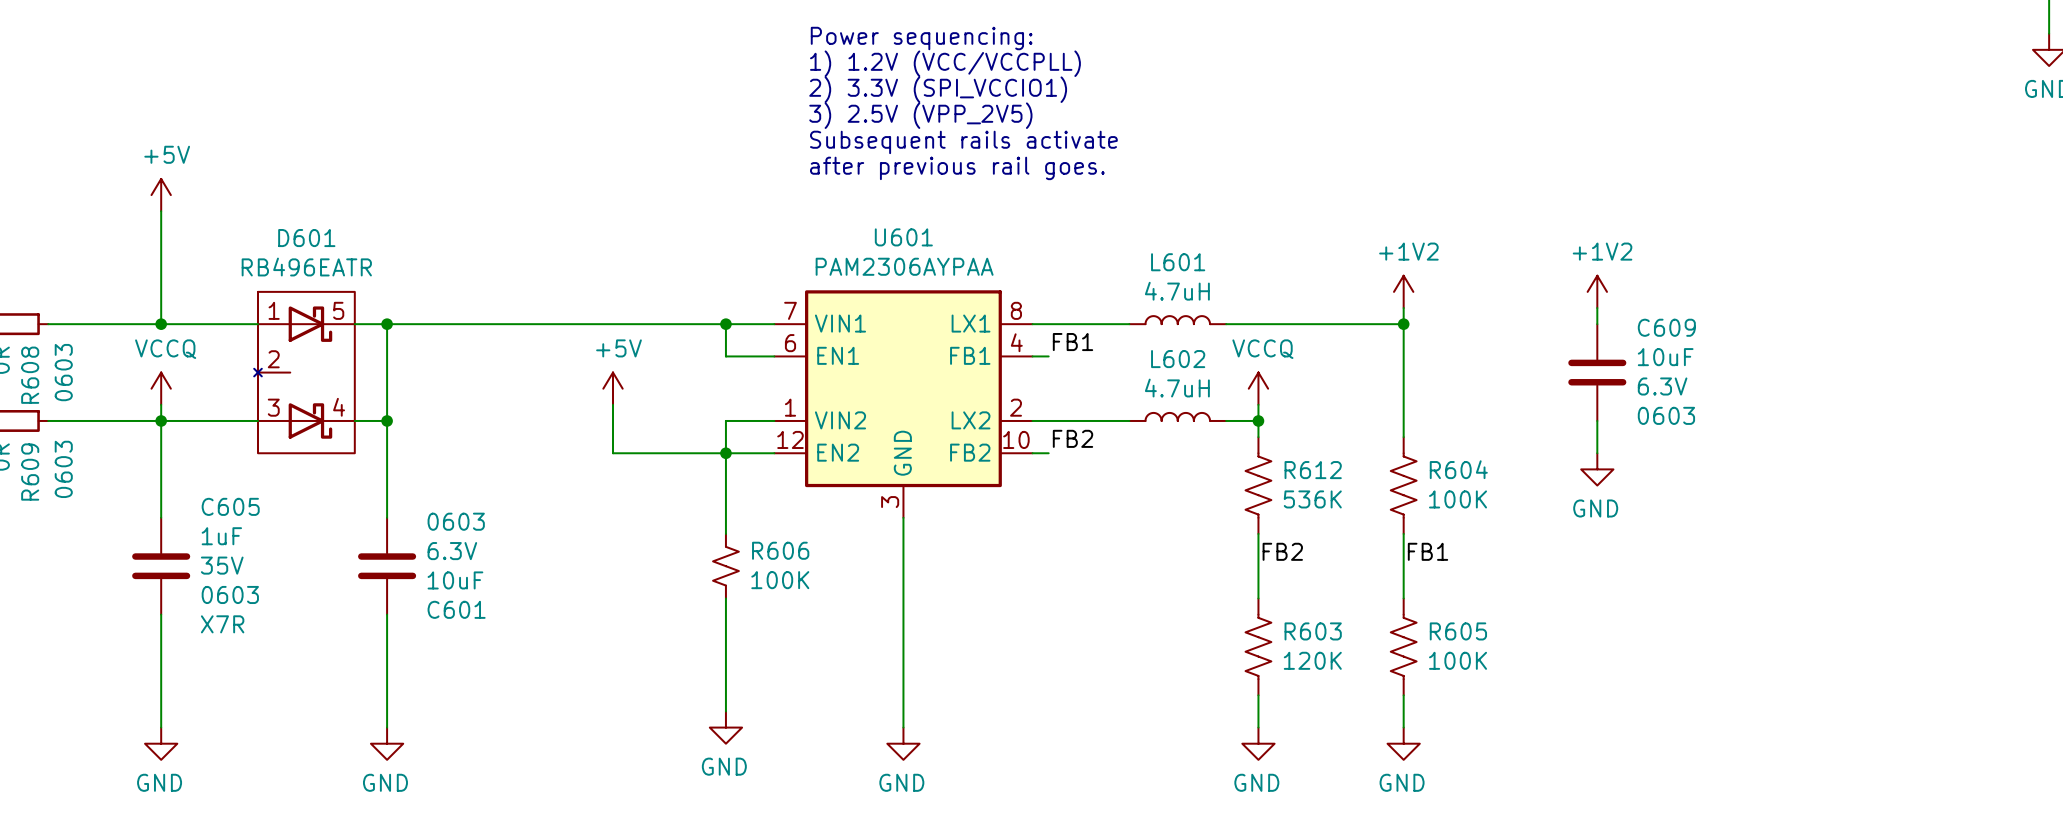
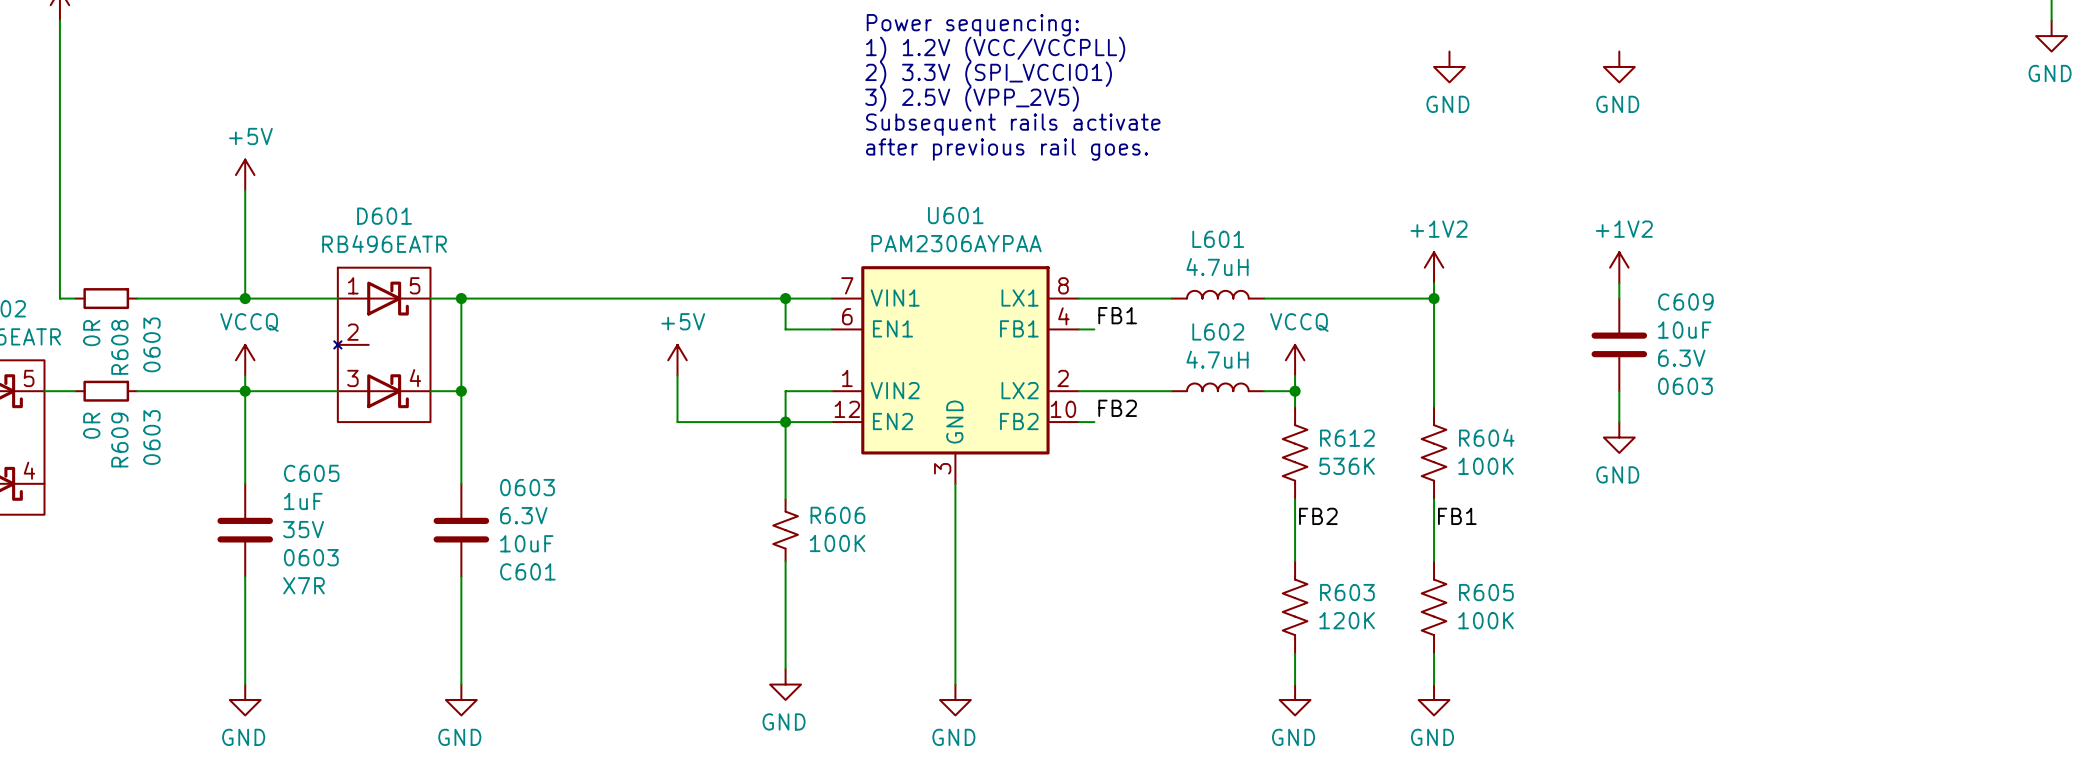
power symbol: none -> GND (1449, 66)
power symbol: none -> GND (1619, 66)

